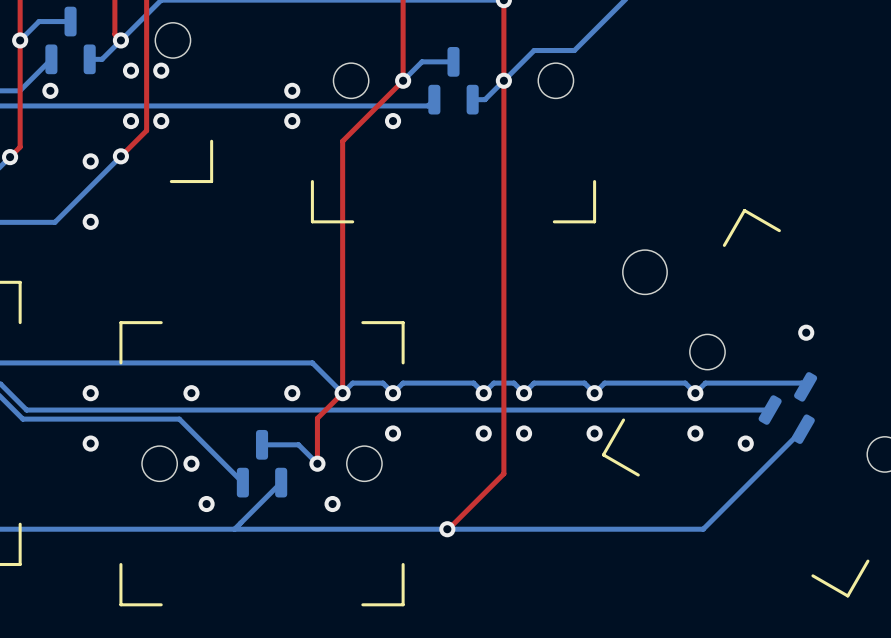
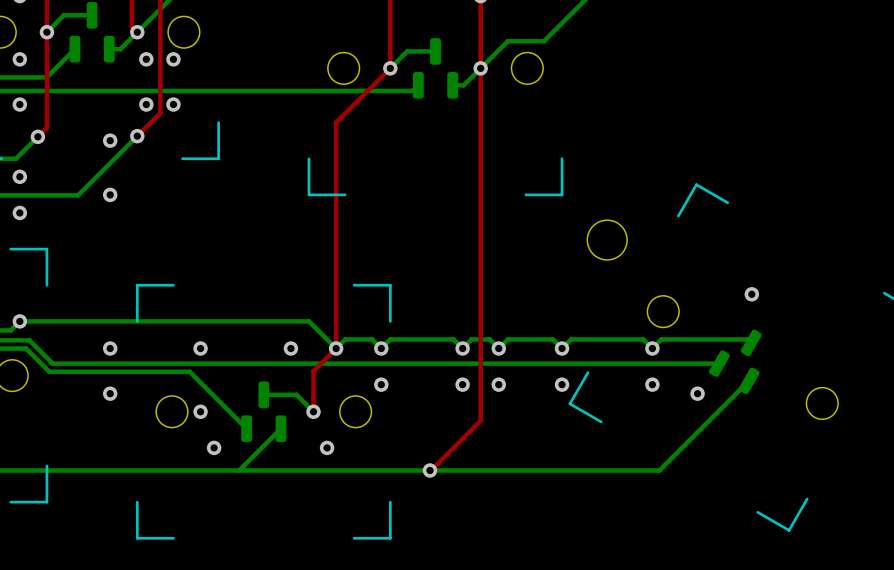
via: (50, 90) -> none
via: (292, 90) -> none
via: (292, 121) -> none
via: (393, 121) -> none

